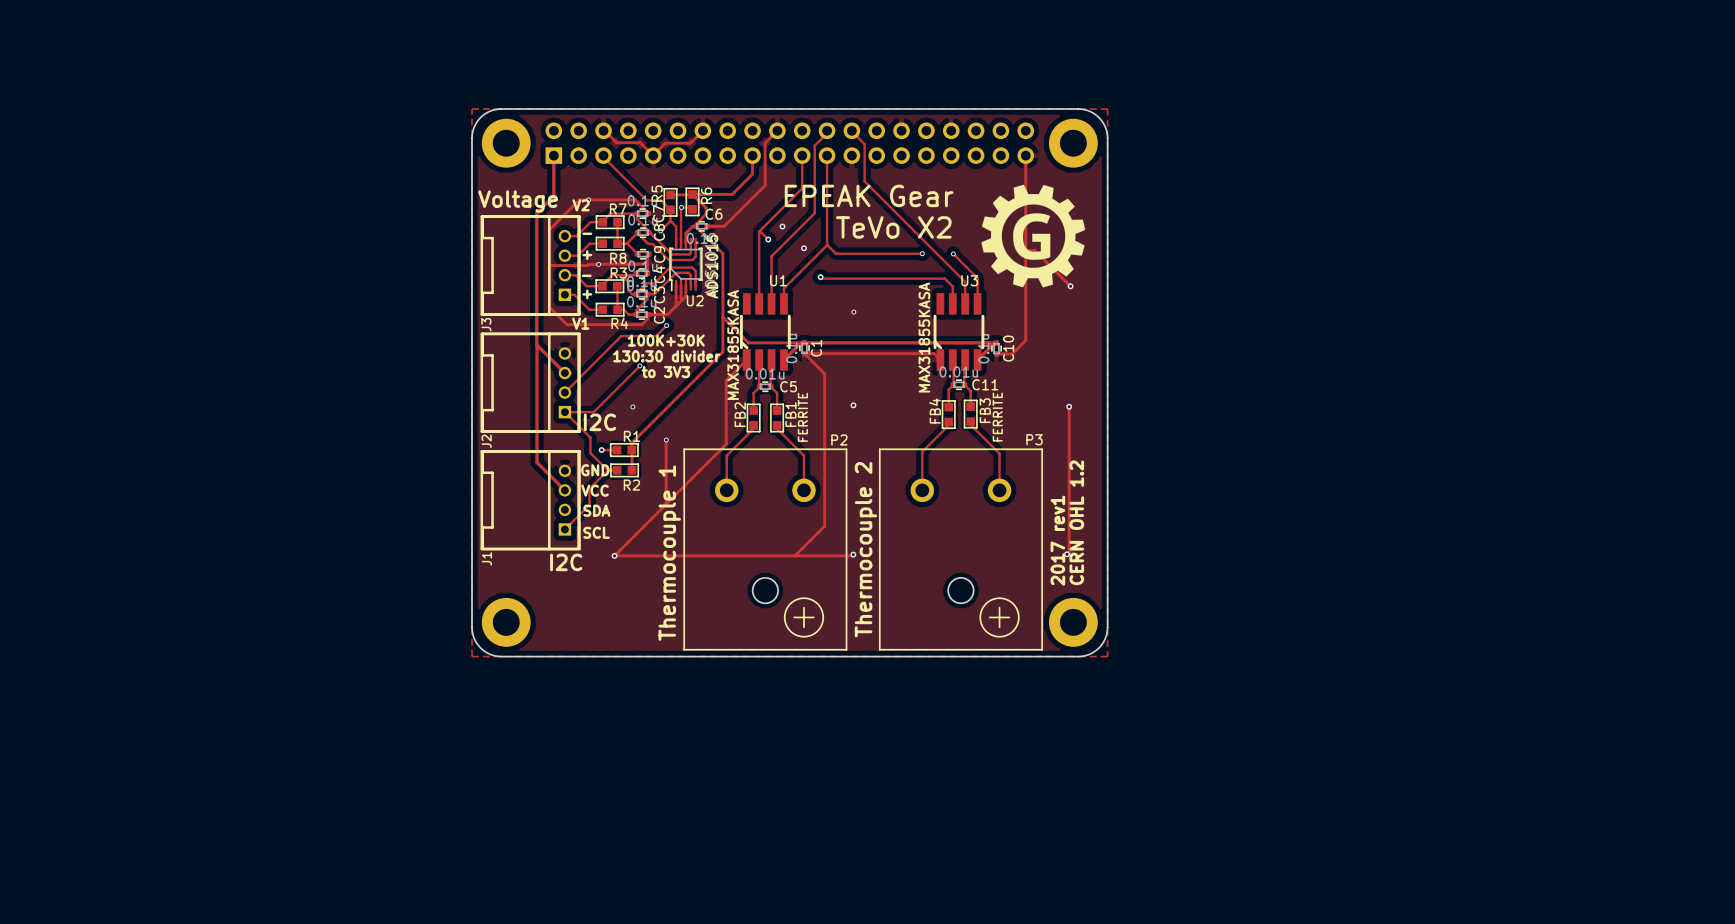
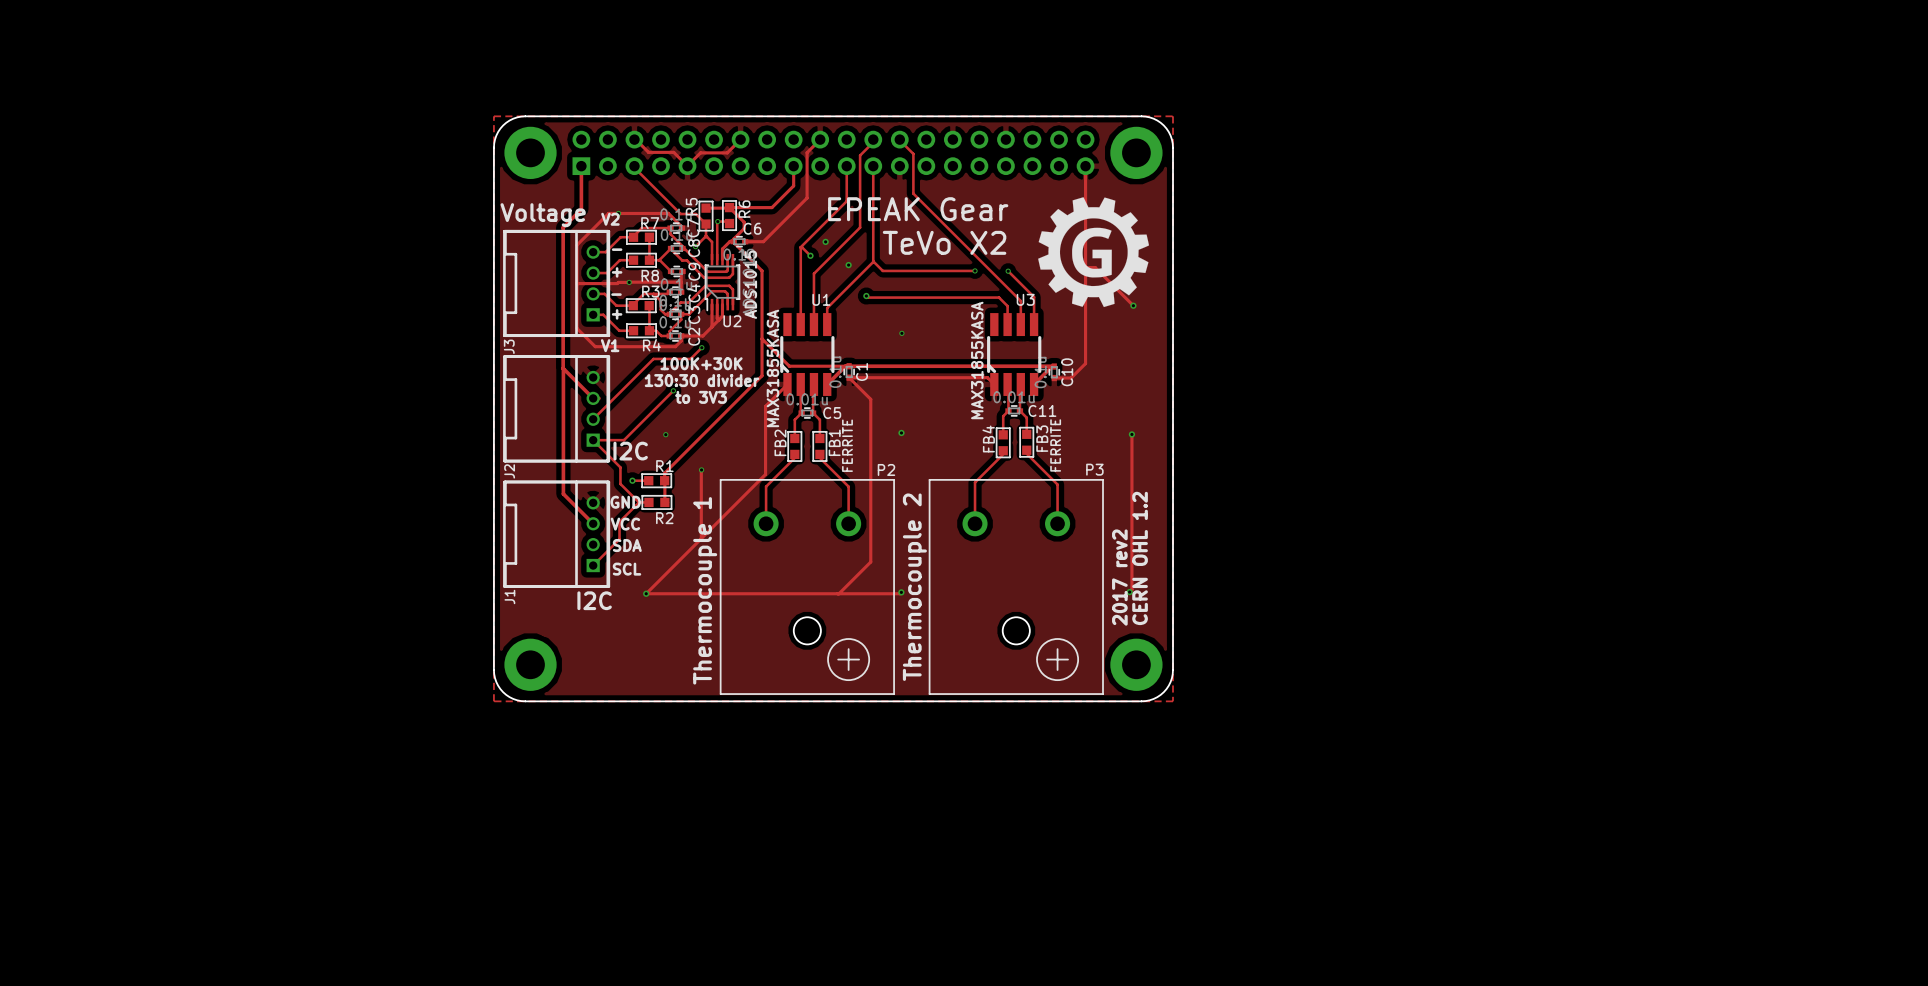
text: 2017 rev1 (1057, 540) -> 2017 rev2 (1119, 577)

